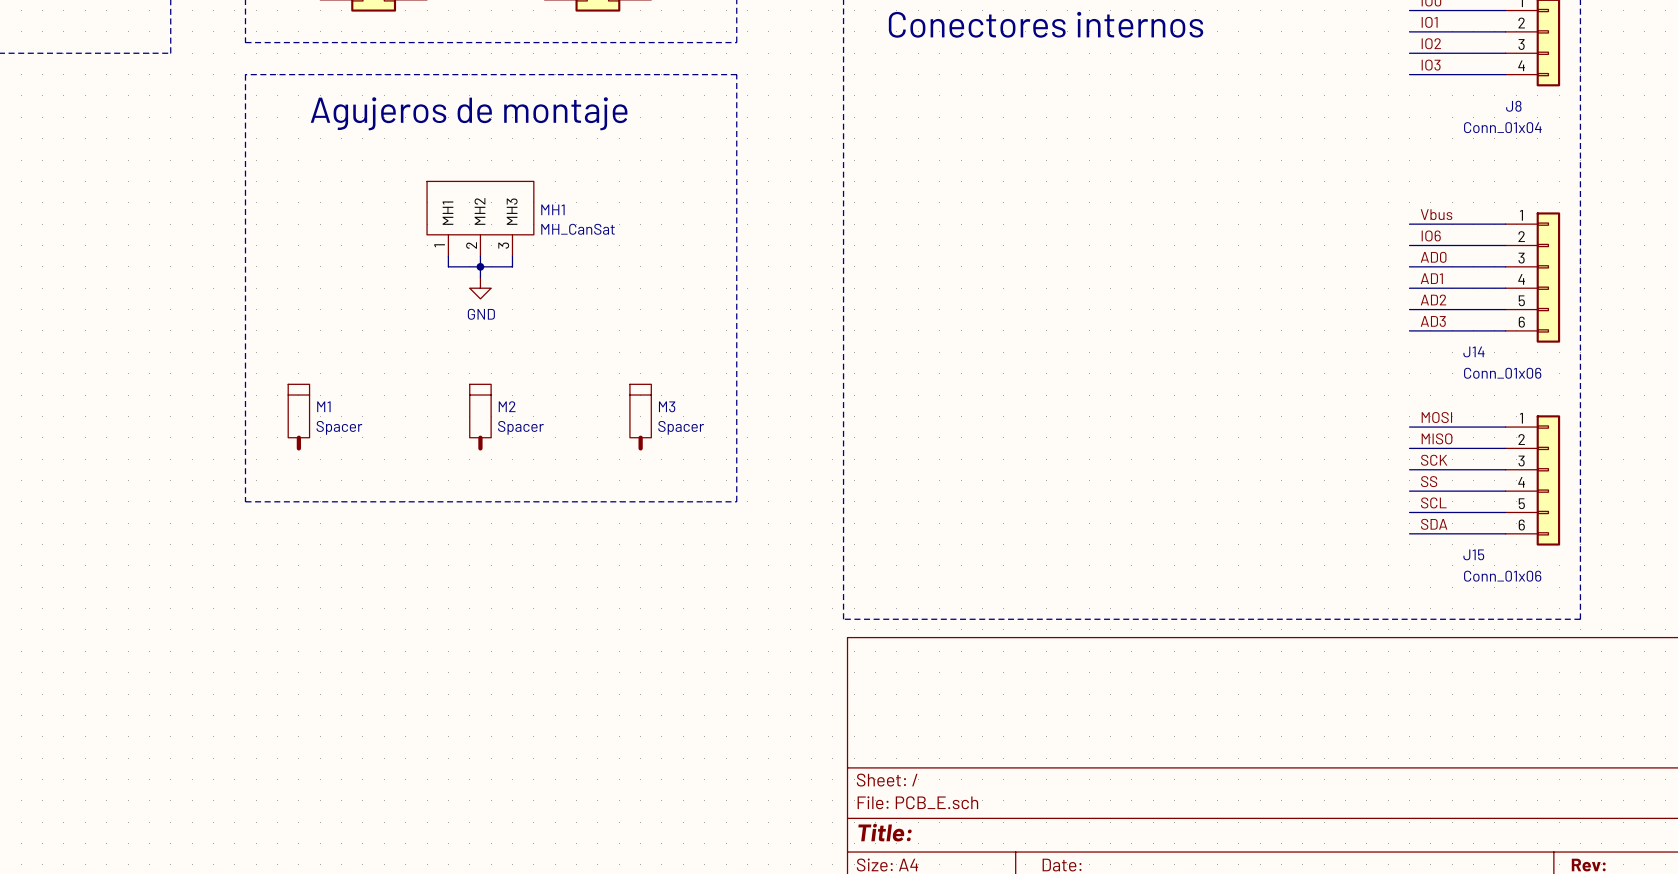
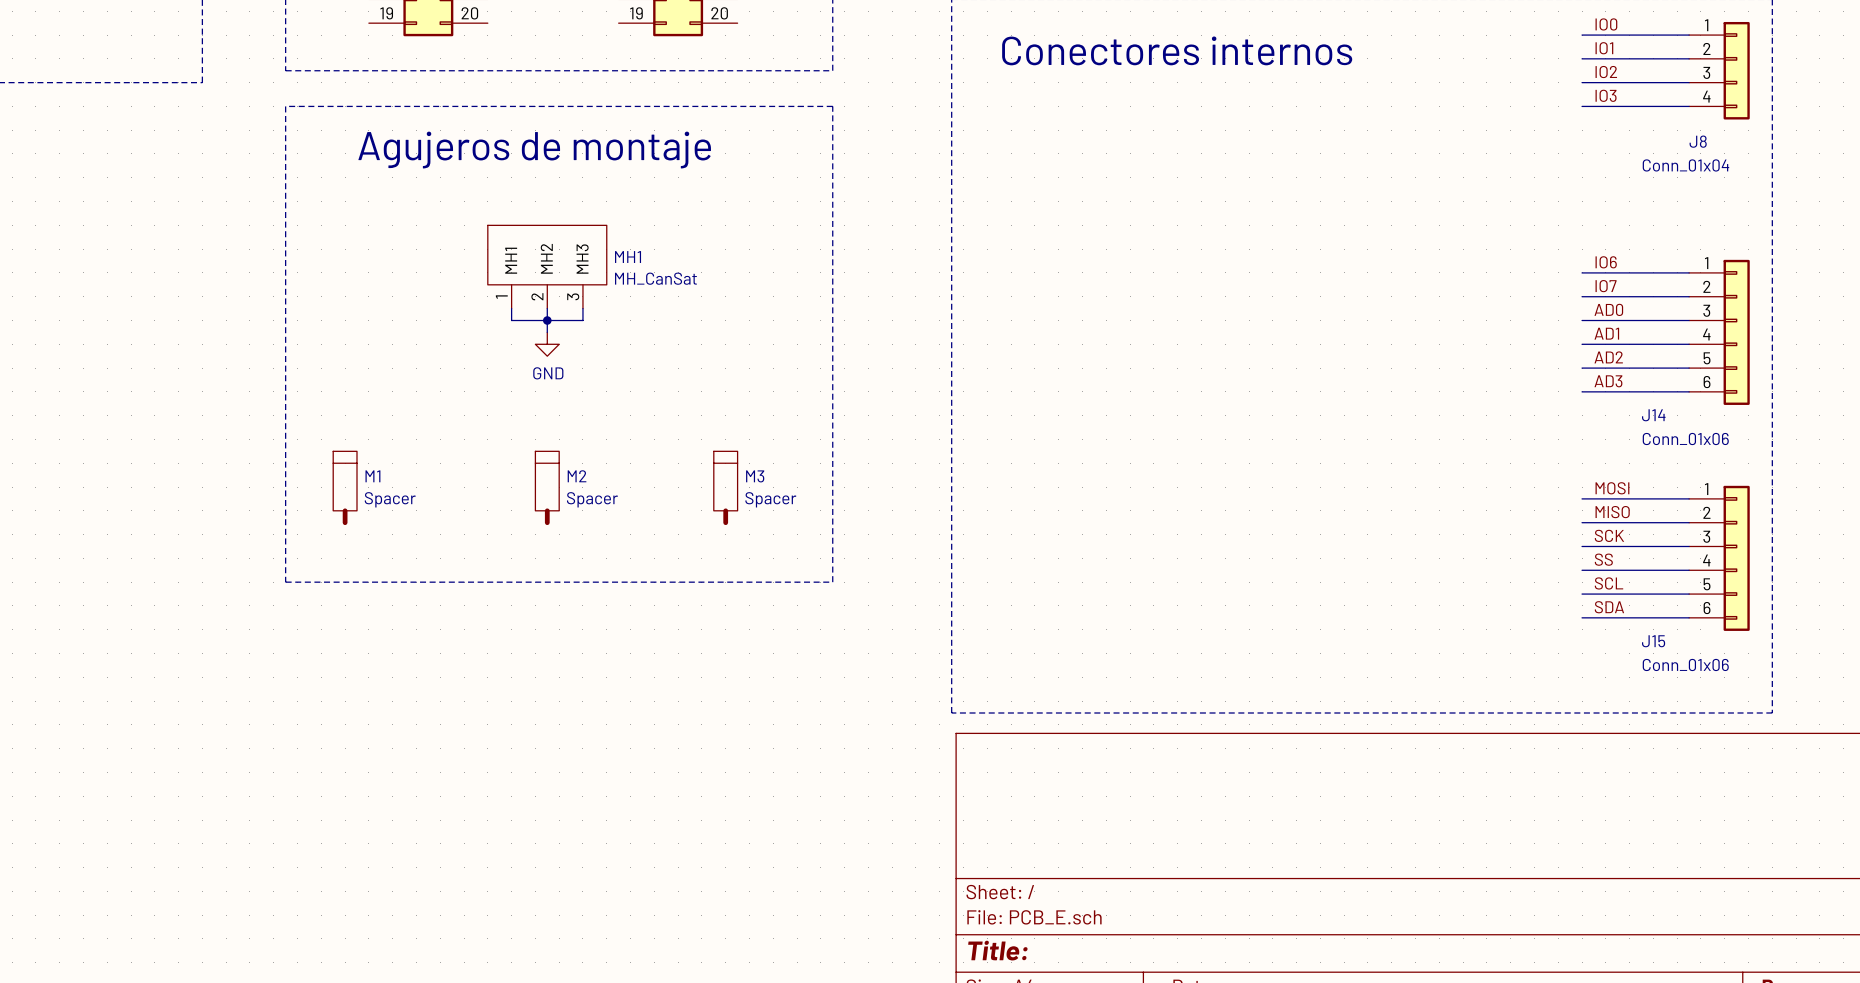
label: Vbus (1436, 214) -> IO6 (1606, 262)
label: IO6 (1431, 235) -> IO7 (1606, 286)

